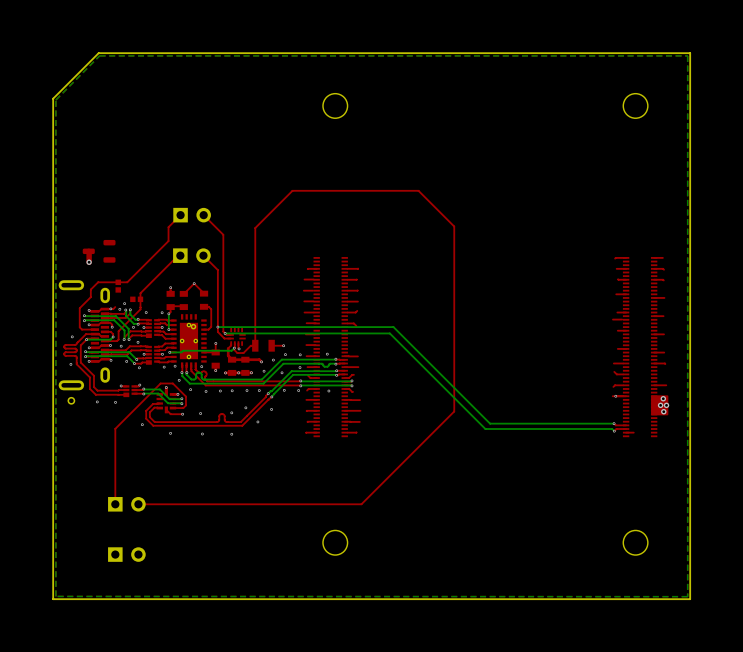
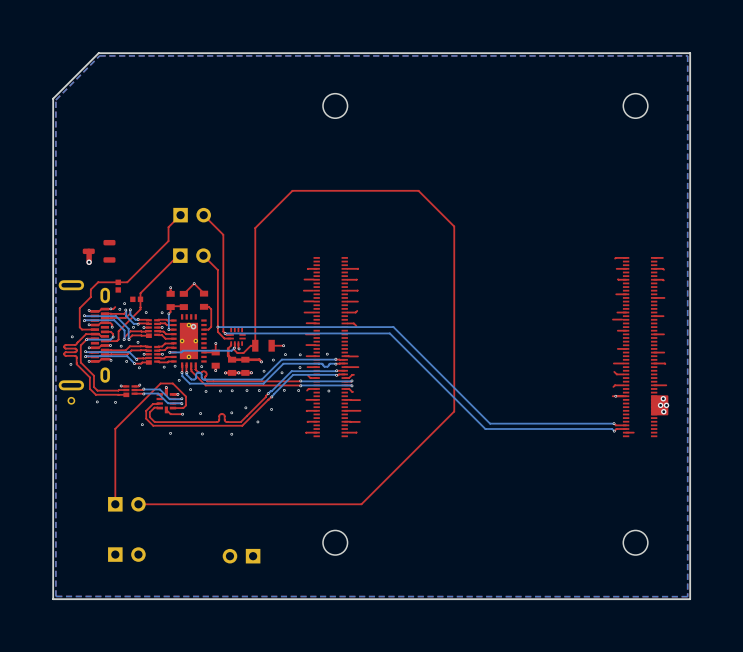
part: none -> (241, 556)

